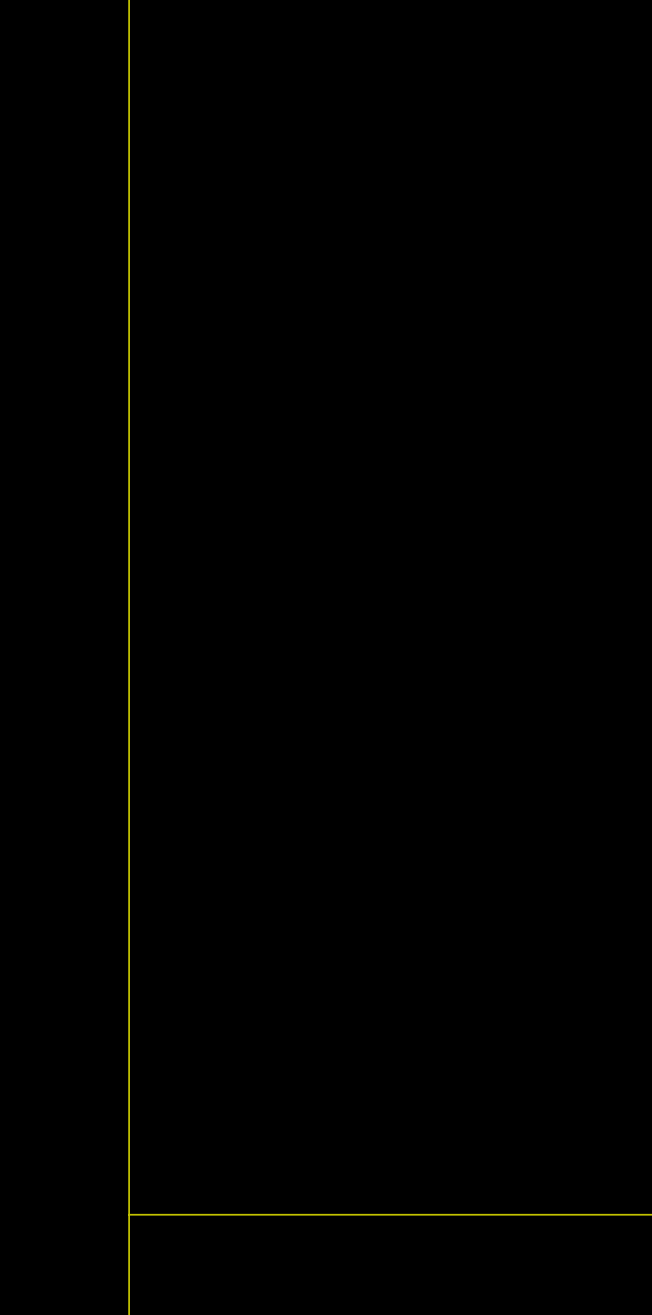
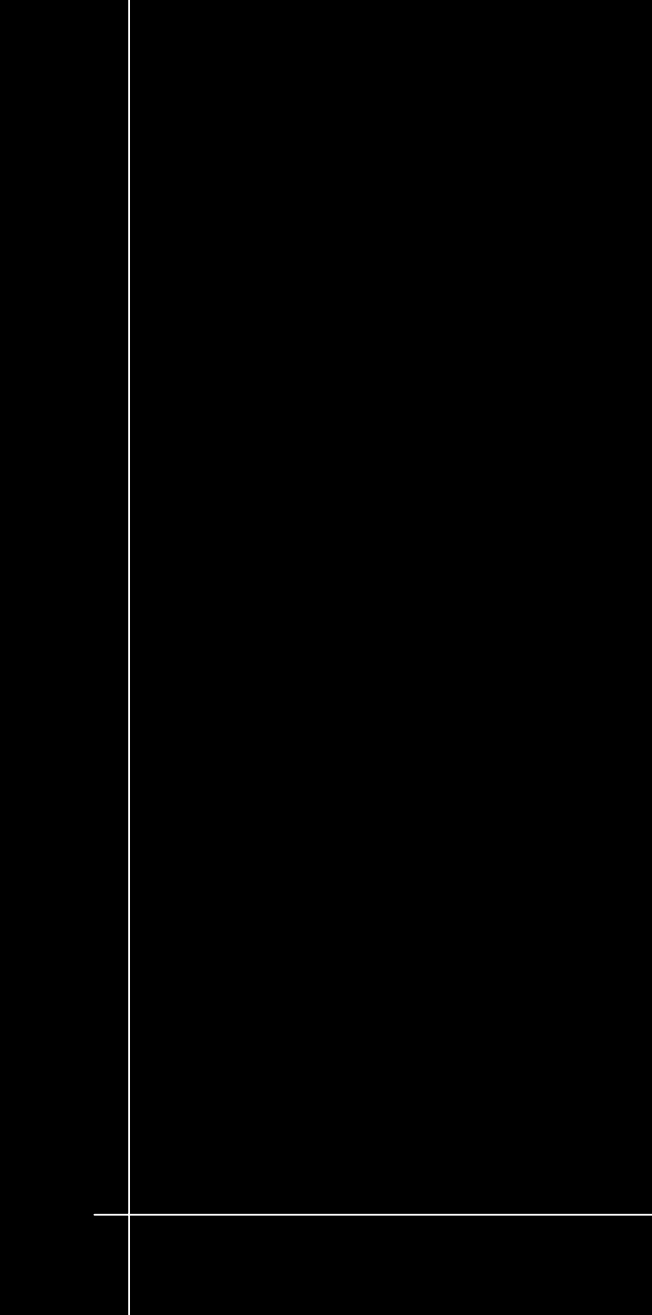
board edge: none -> (129, 1214) (94, 1214)

